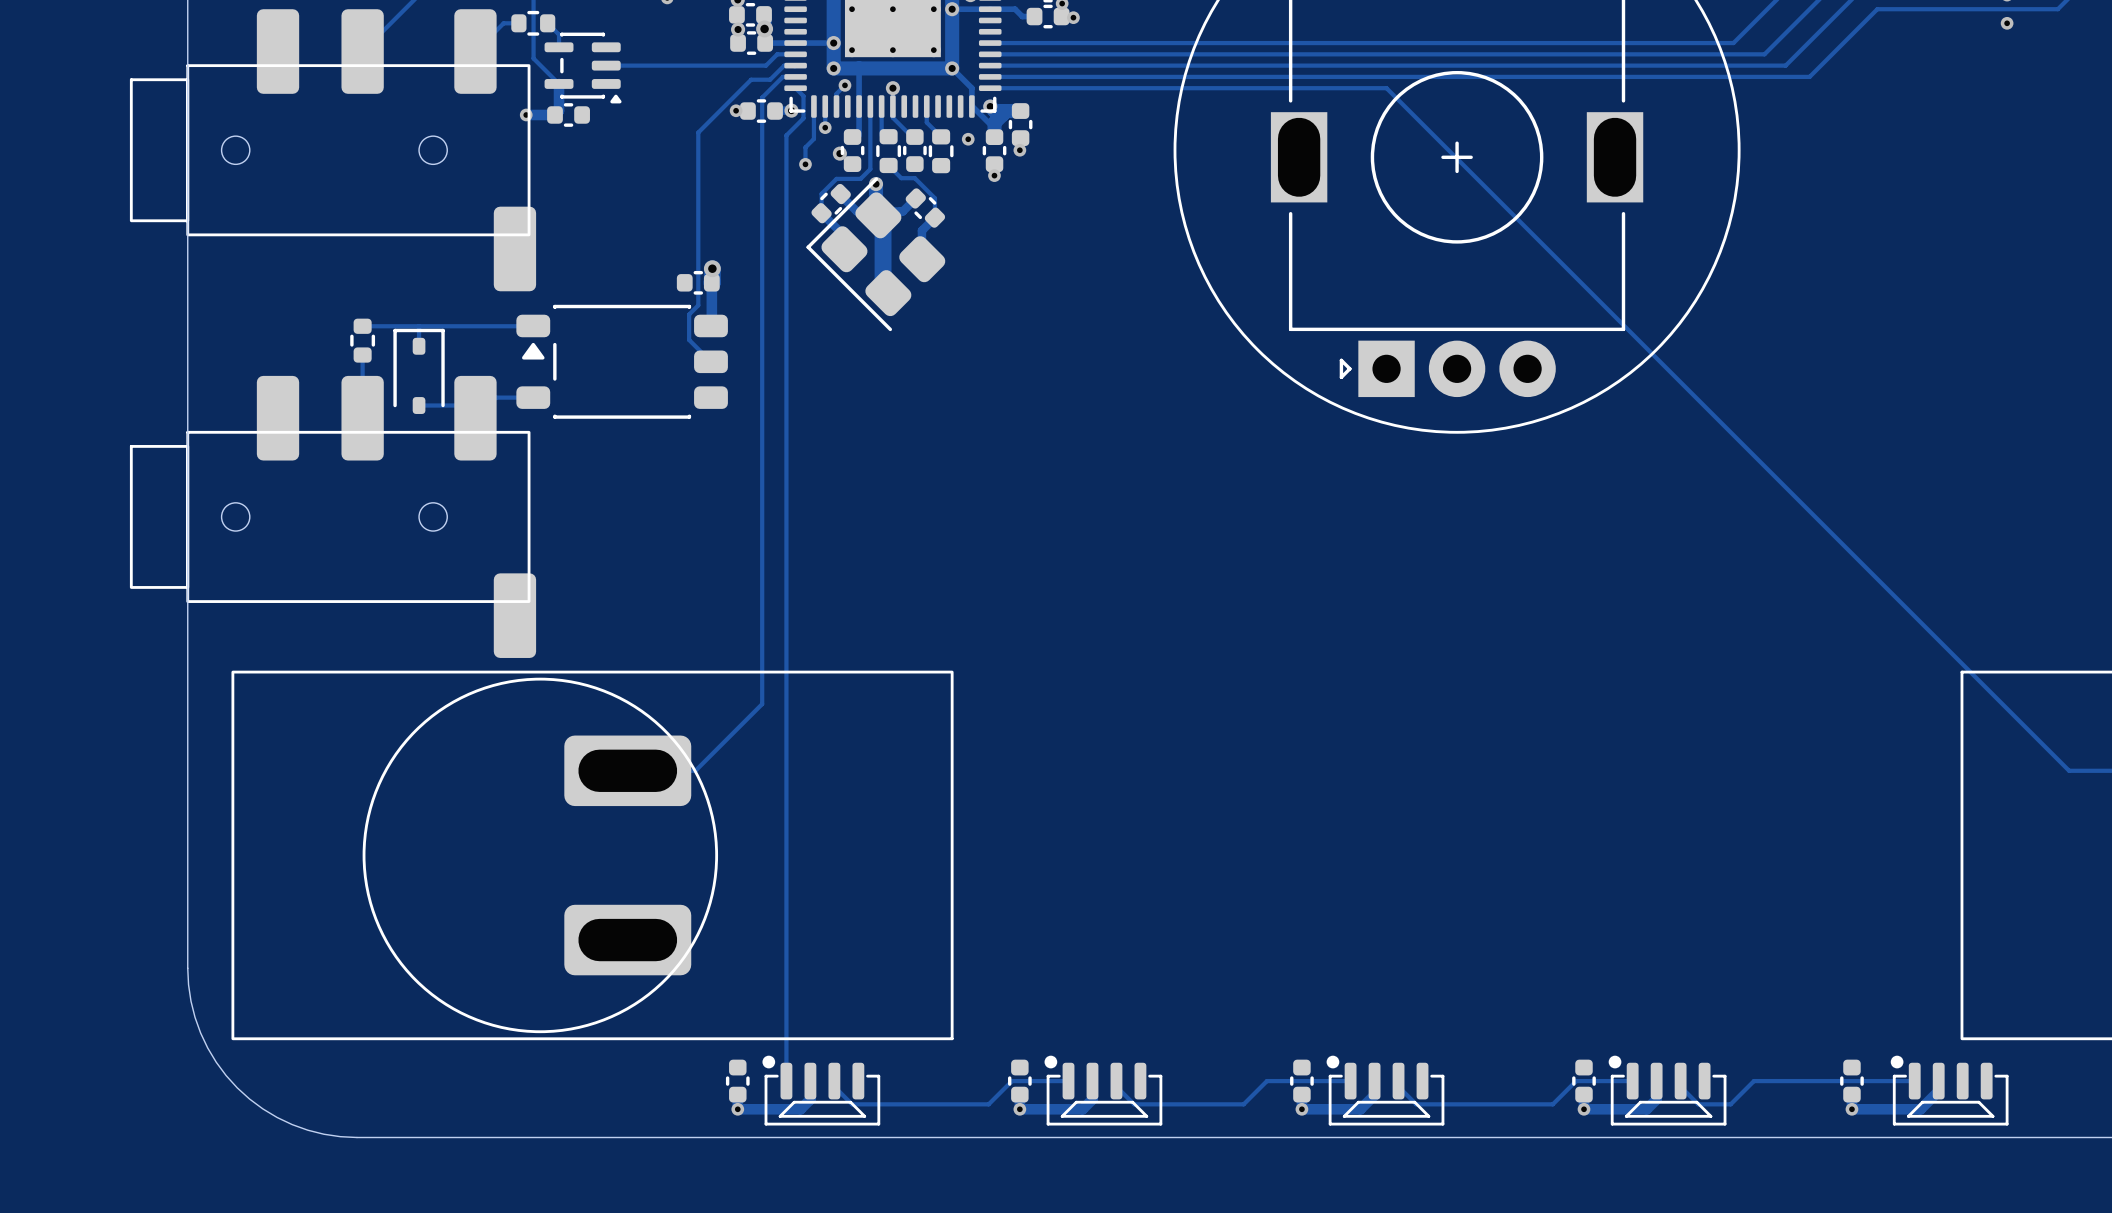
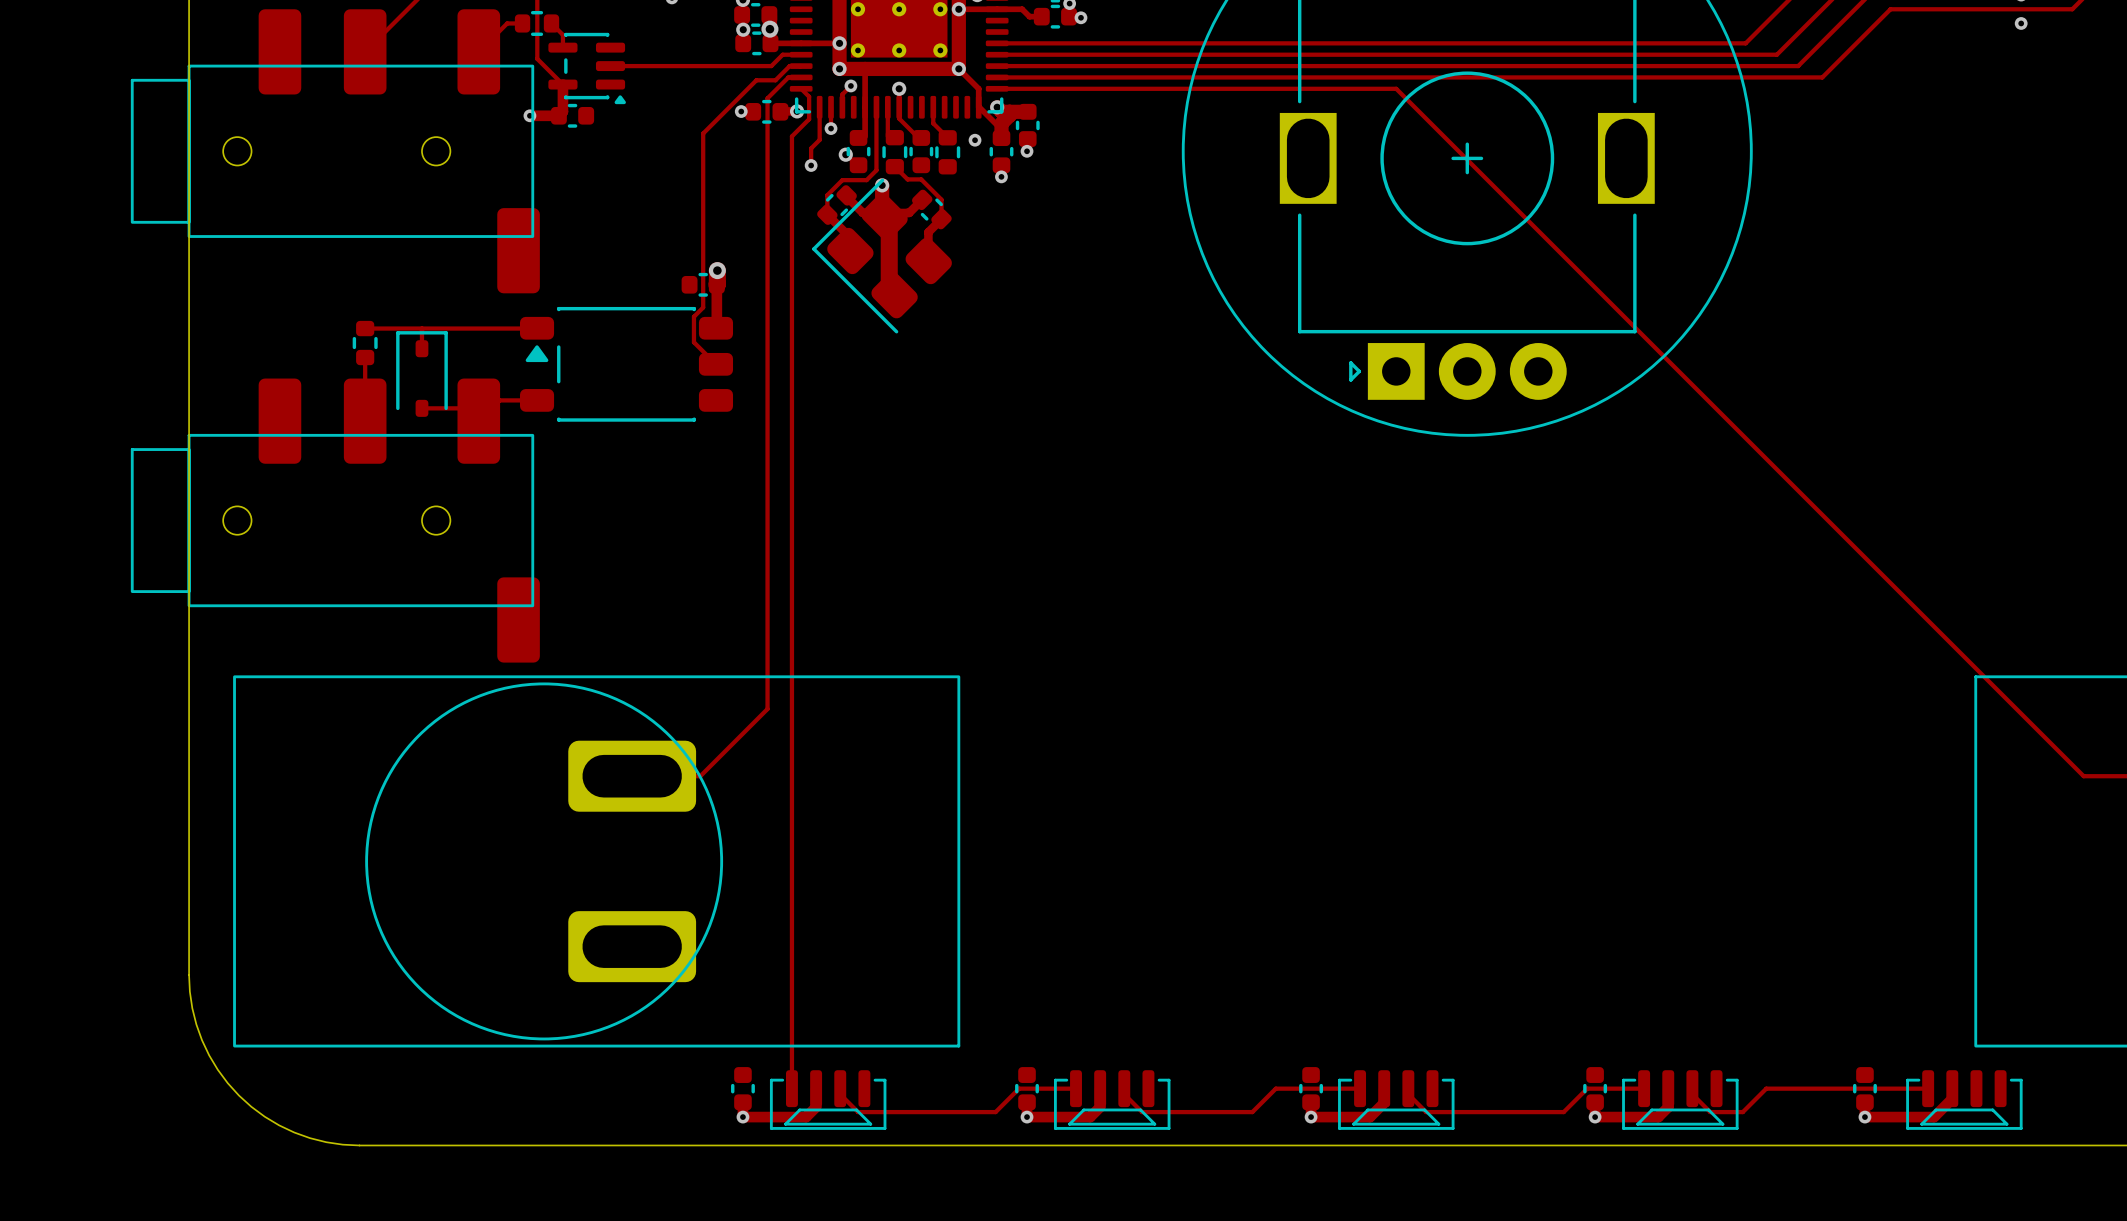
part footprint: [762, 1055, 881, 1126] -> [769, 1070, 887, 1130]
part footprint: [1044, 1055, 1163, 1126] -> [1053, 1070, 1171, 1130]
part footprint: [1326, 1055, 1445, 1126] -> [1338, 1070, 1455, 1130]
part footprint: [1608, 1055, 1727, 1126] -> [1622, 1070, 1739, 1130]
part footprint: [1890, 1055, 2009, 1126] -> [1906, 1070, 2023, 1130]

